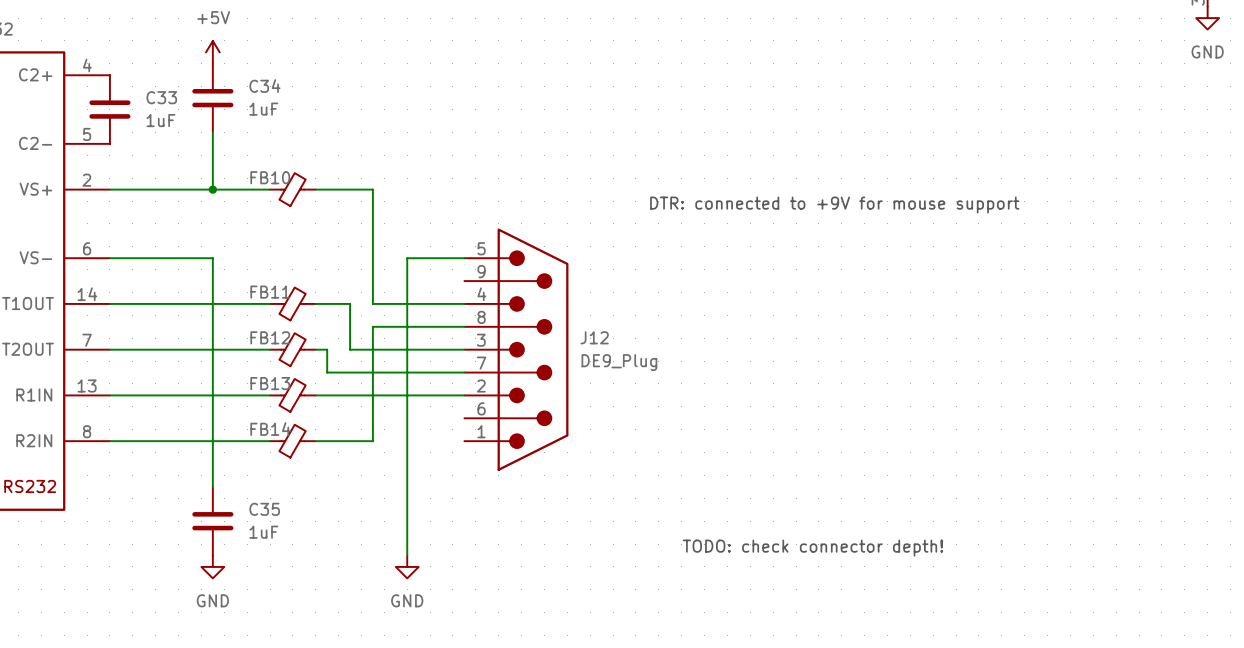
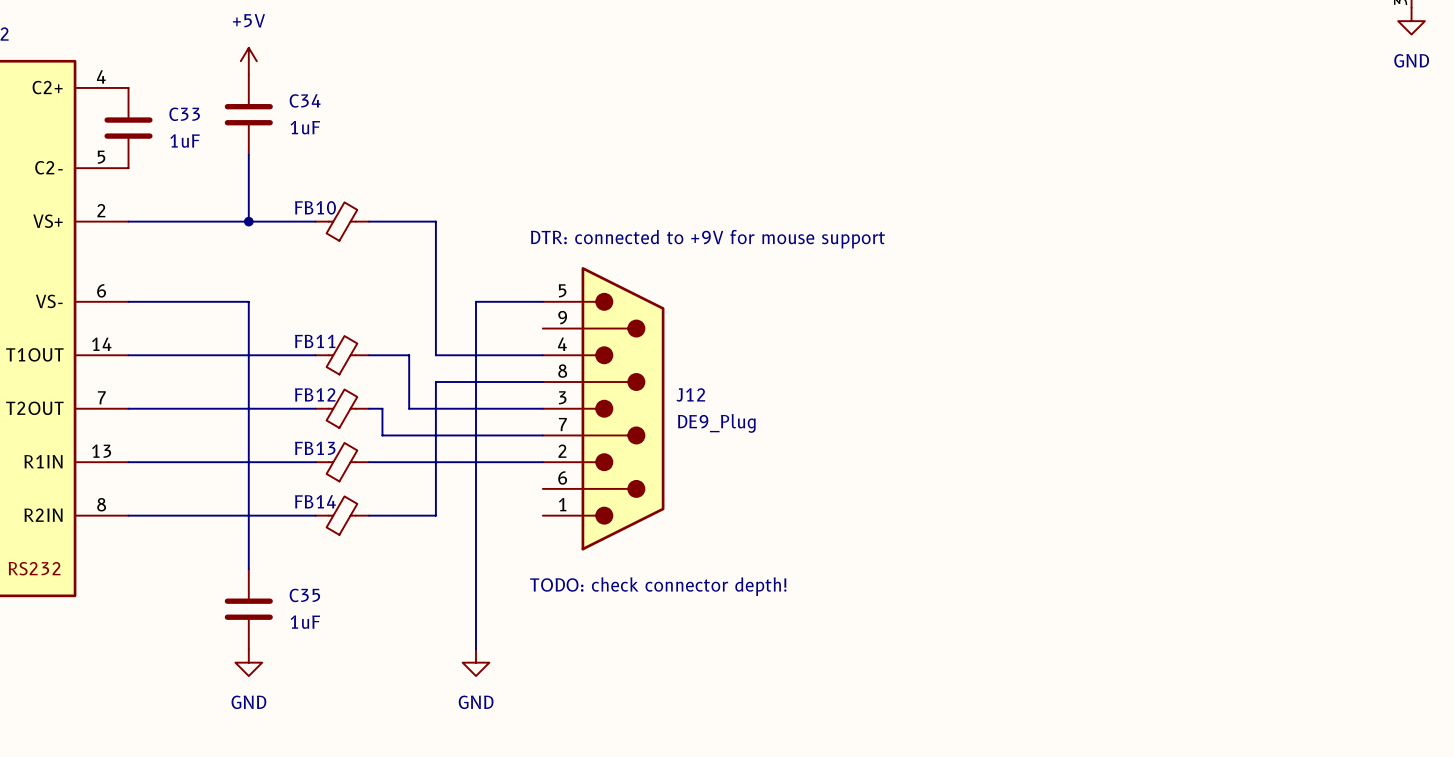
text position: DTR: connected to +9V for mouse support (834, 205) -> DTR: connected to +9V for mouse support (707, 239)
text: none -> TODO: check connector depth! (658, 586)
text: TODO: check connector depth! (812, 548) -> none

